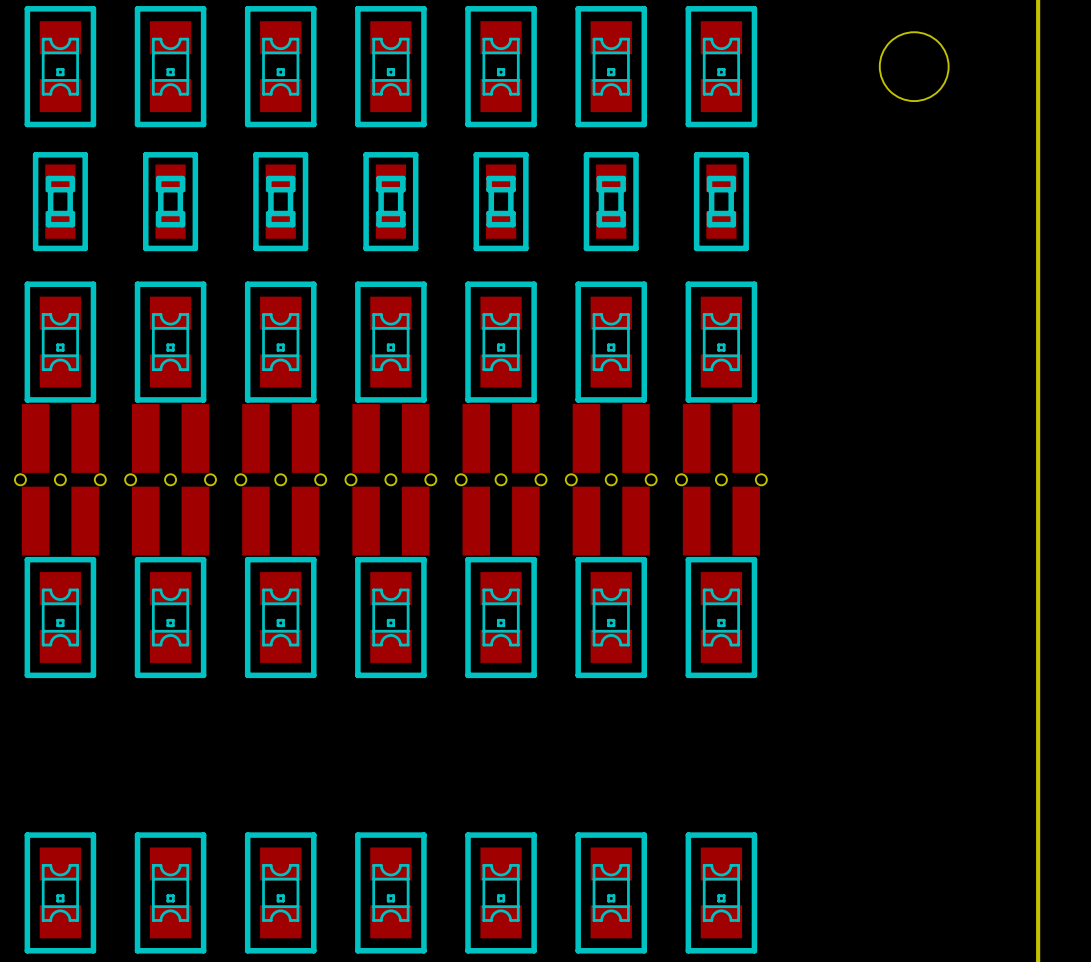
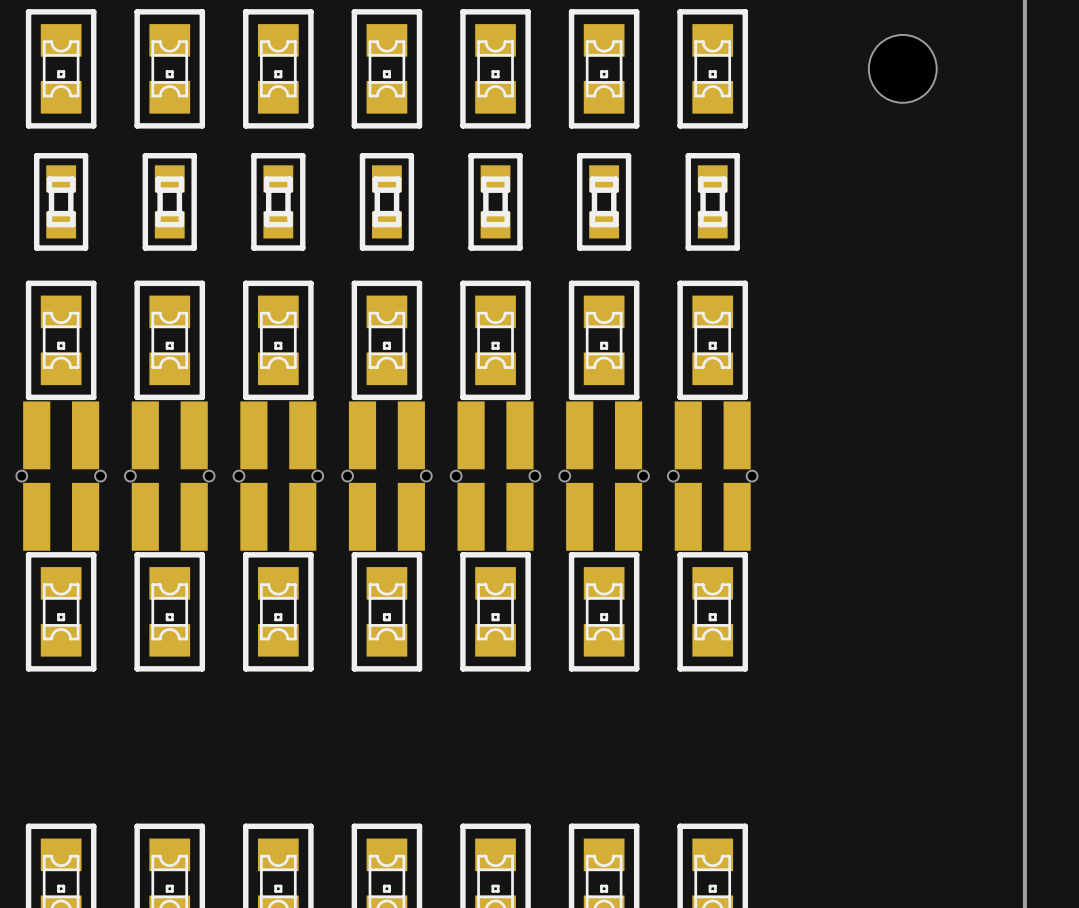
part footprint: [14, 474, 106, 556] -> [16, 470, 106, 551]
part footprint: [125, 474, 217, 556] -> [124, 470, 215, 551]
part footprint: [235, 474, 327, 556] -> [233, 470, 324, 551]
part footprint: [345, 474, 437, 556] -> [342, 470, 432, 551]
part footprint: [455, 474, 547, 556] -> [450, 470, 541, 551]
part footprint: [565, 474, 657, 556] -> [559, 470, 649, 551]
part footprint: [675, 474, 767, 556] -> [667, 470, 758, 551]

